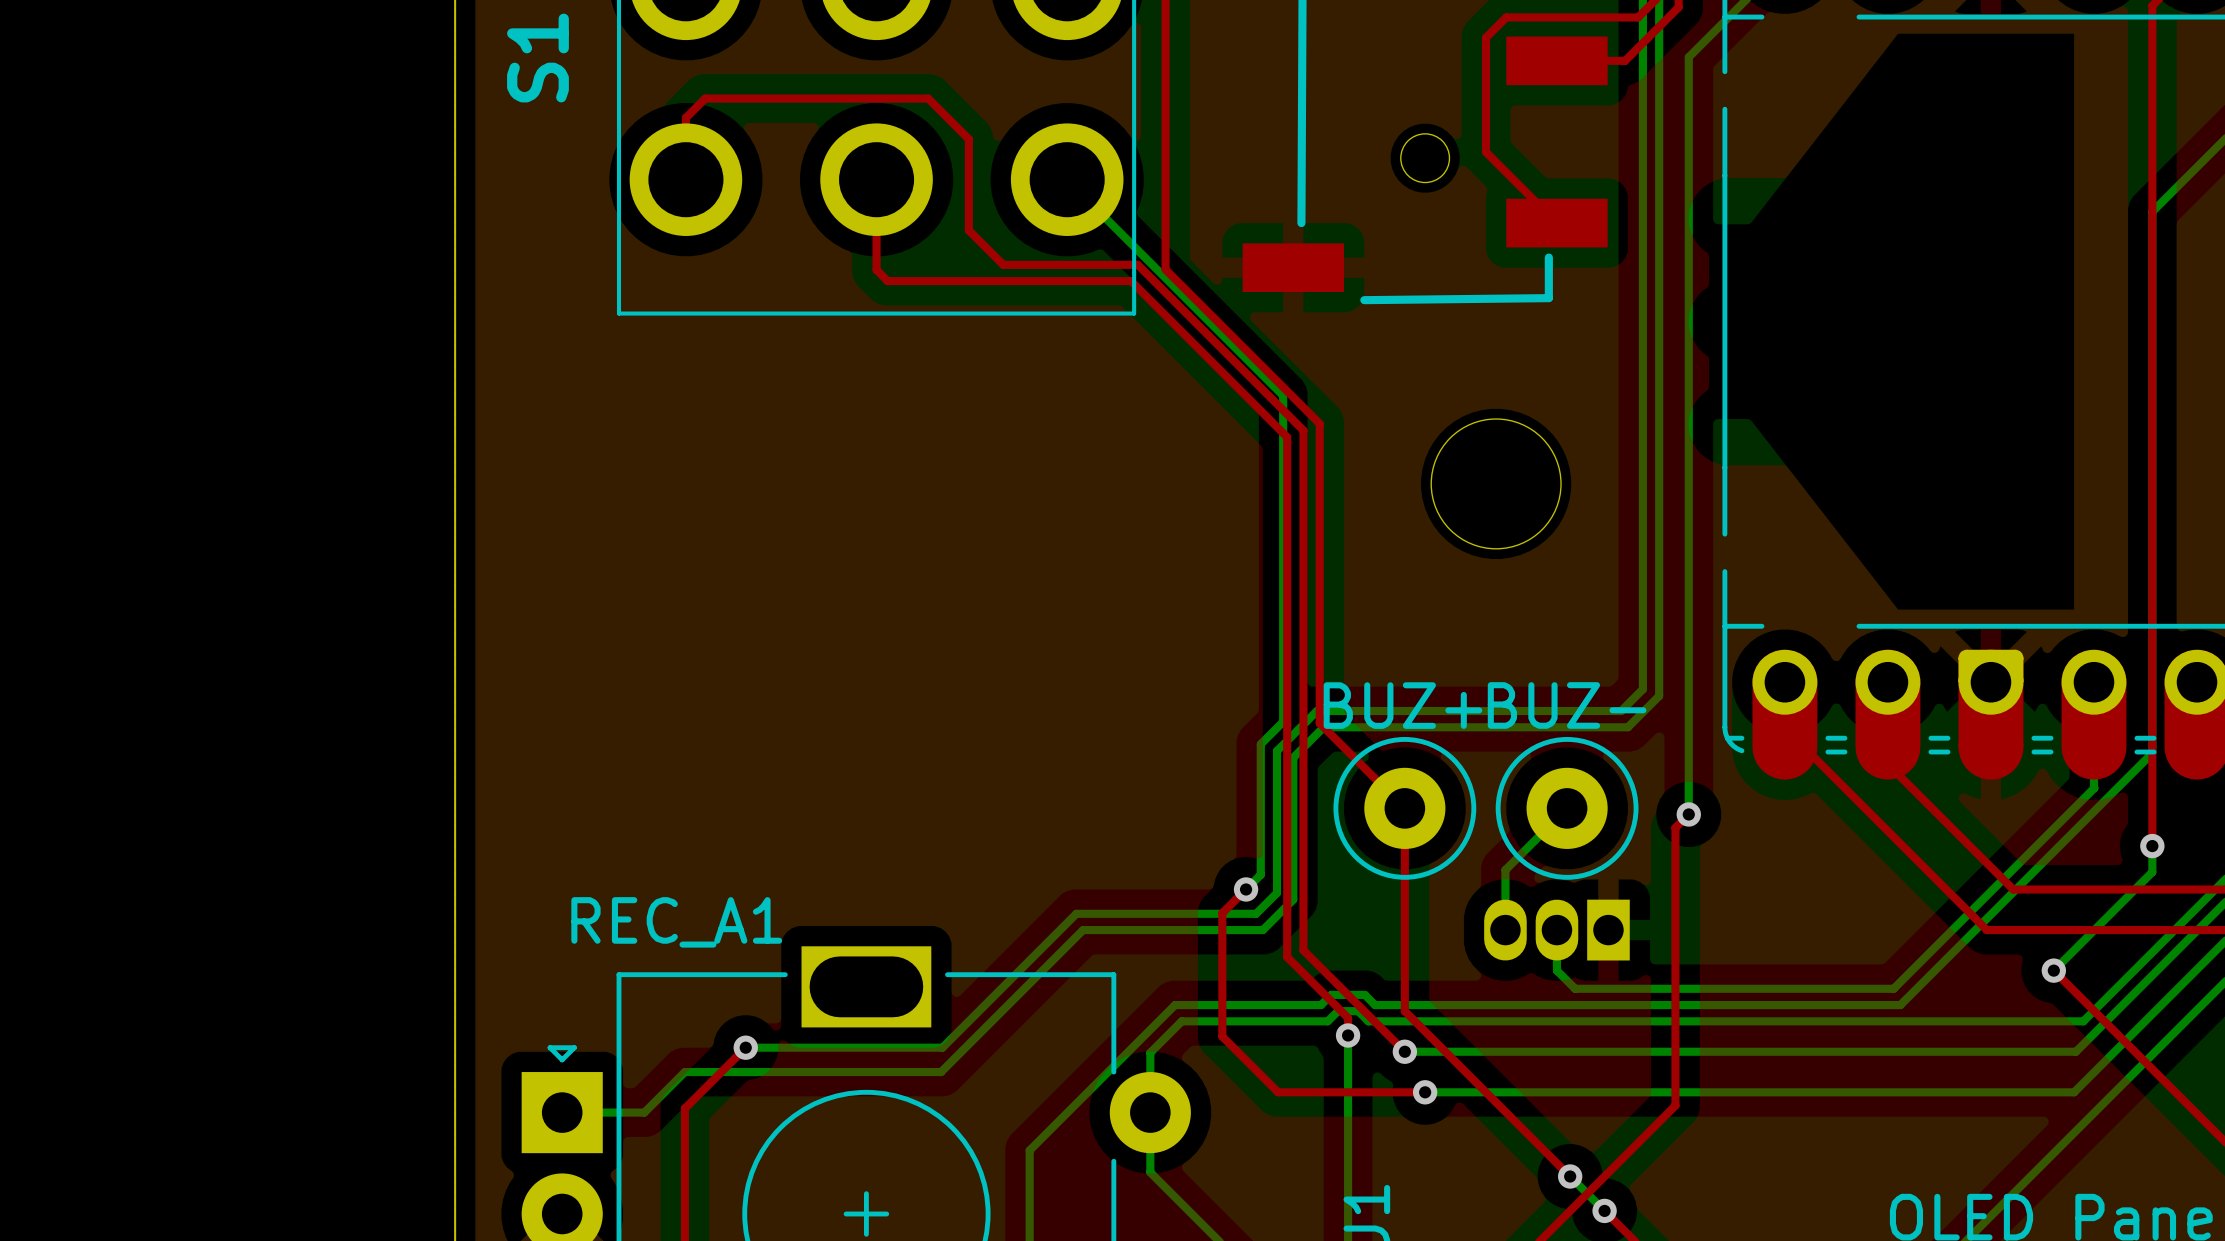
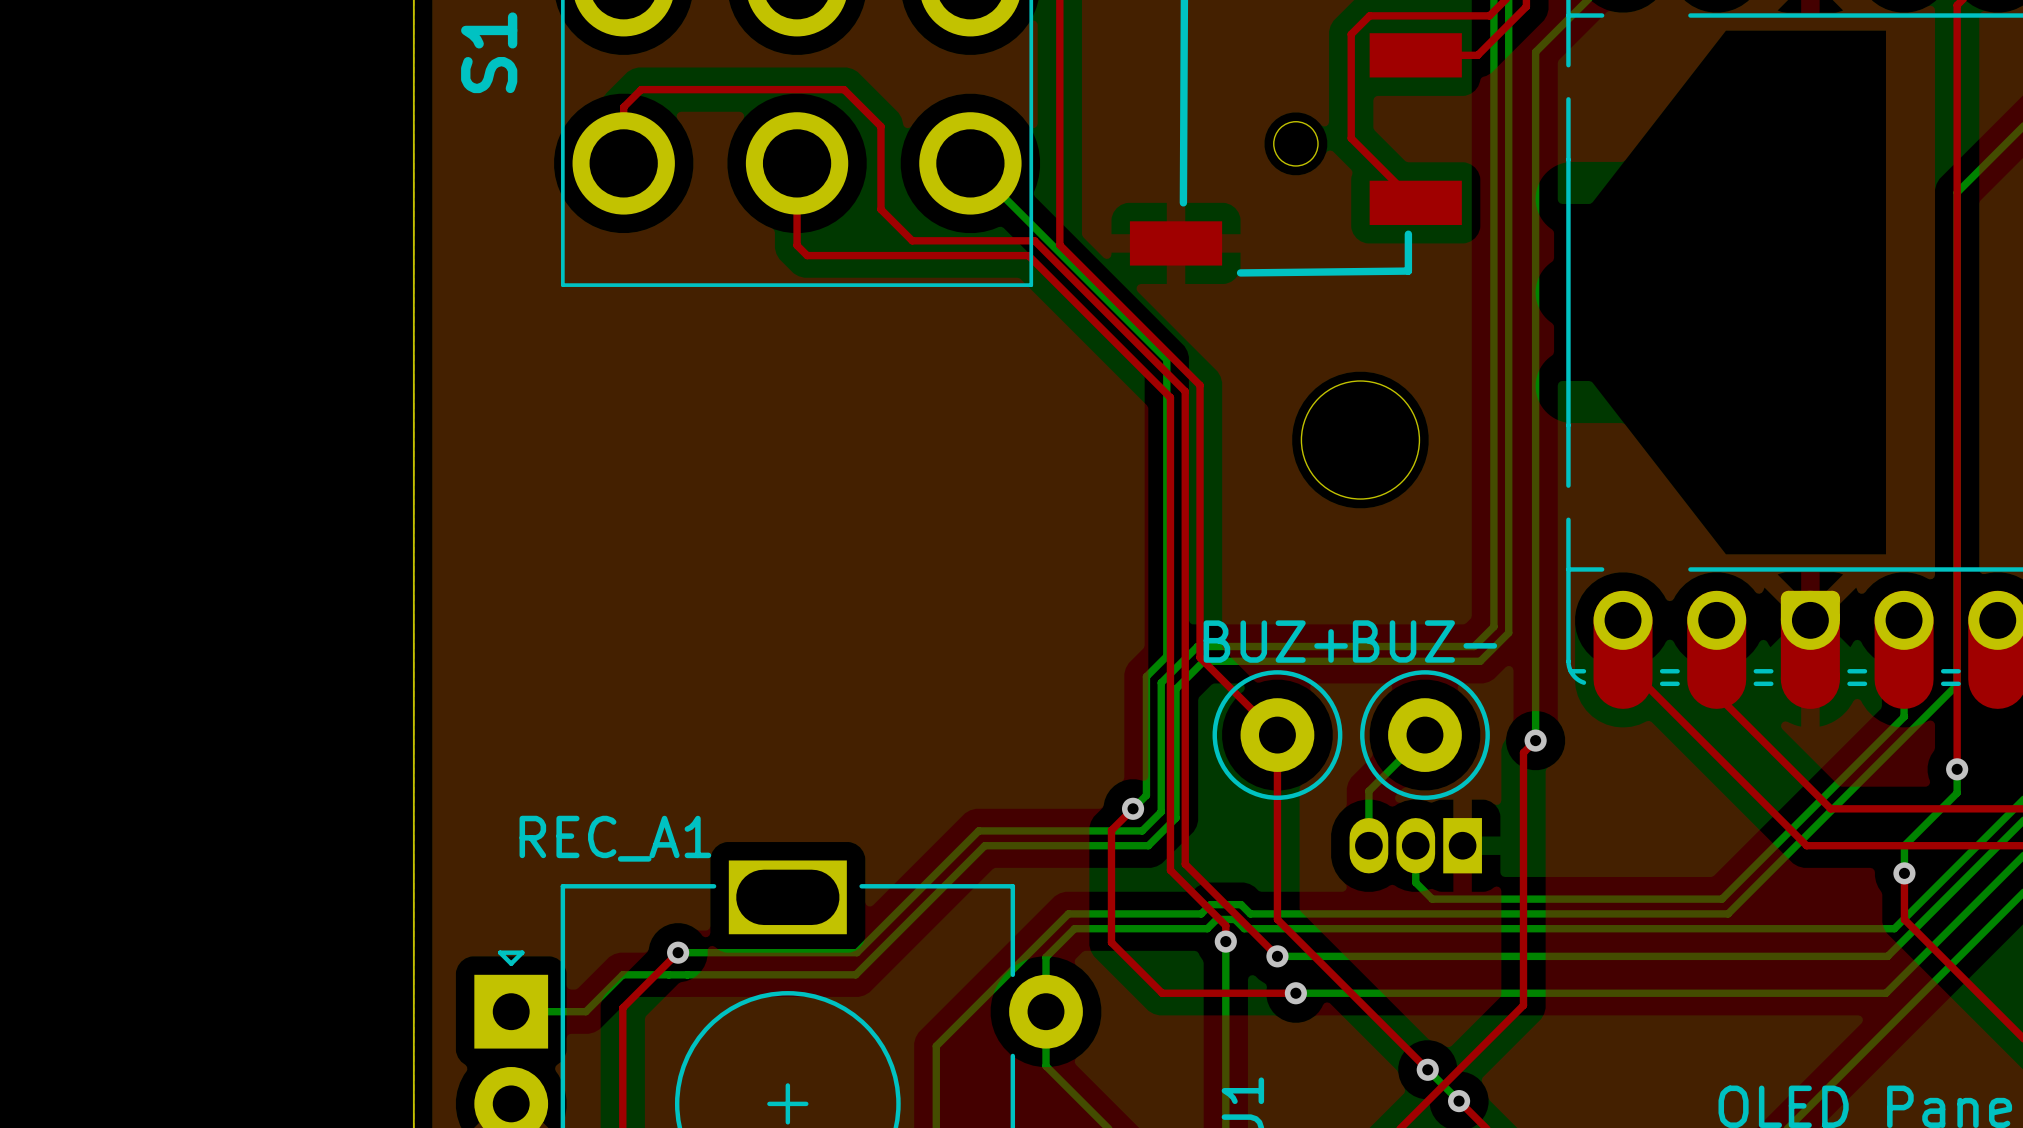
bottom track: (2094, 930) (2053, 970) -> (1904, 845) (1904, 873)
top track: (2053, 970) (2094, 1011) -> (1904, 873) (1904, 919)
via position: (2053, 970) -> (1904, 873)

